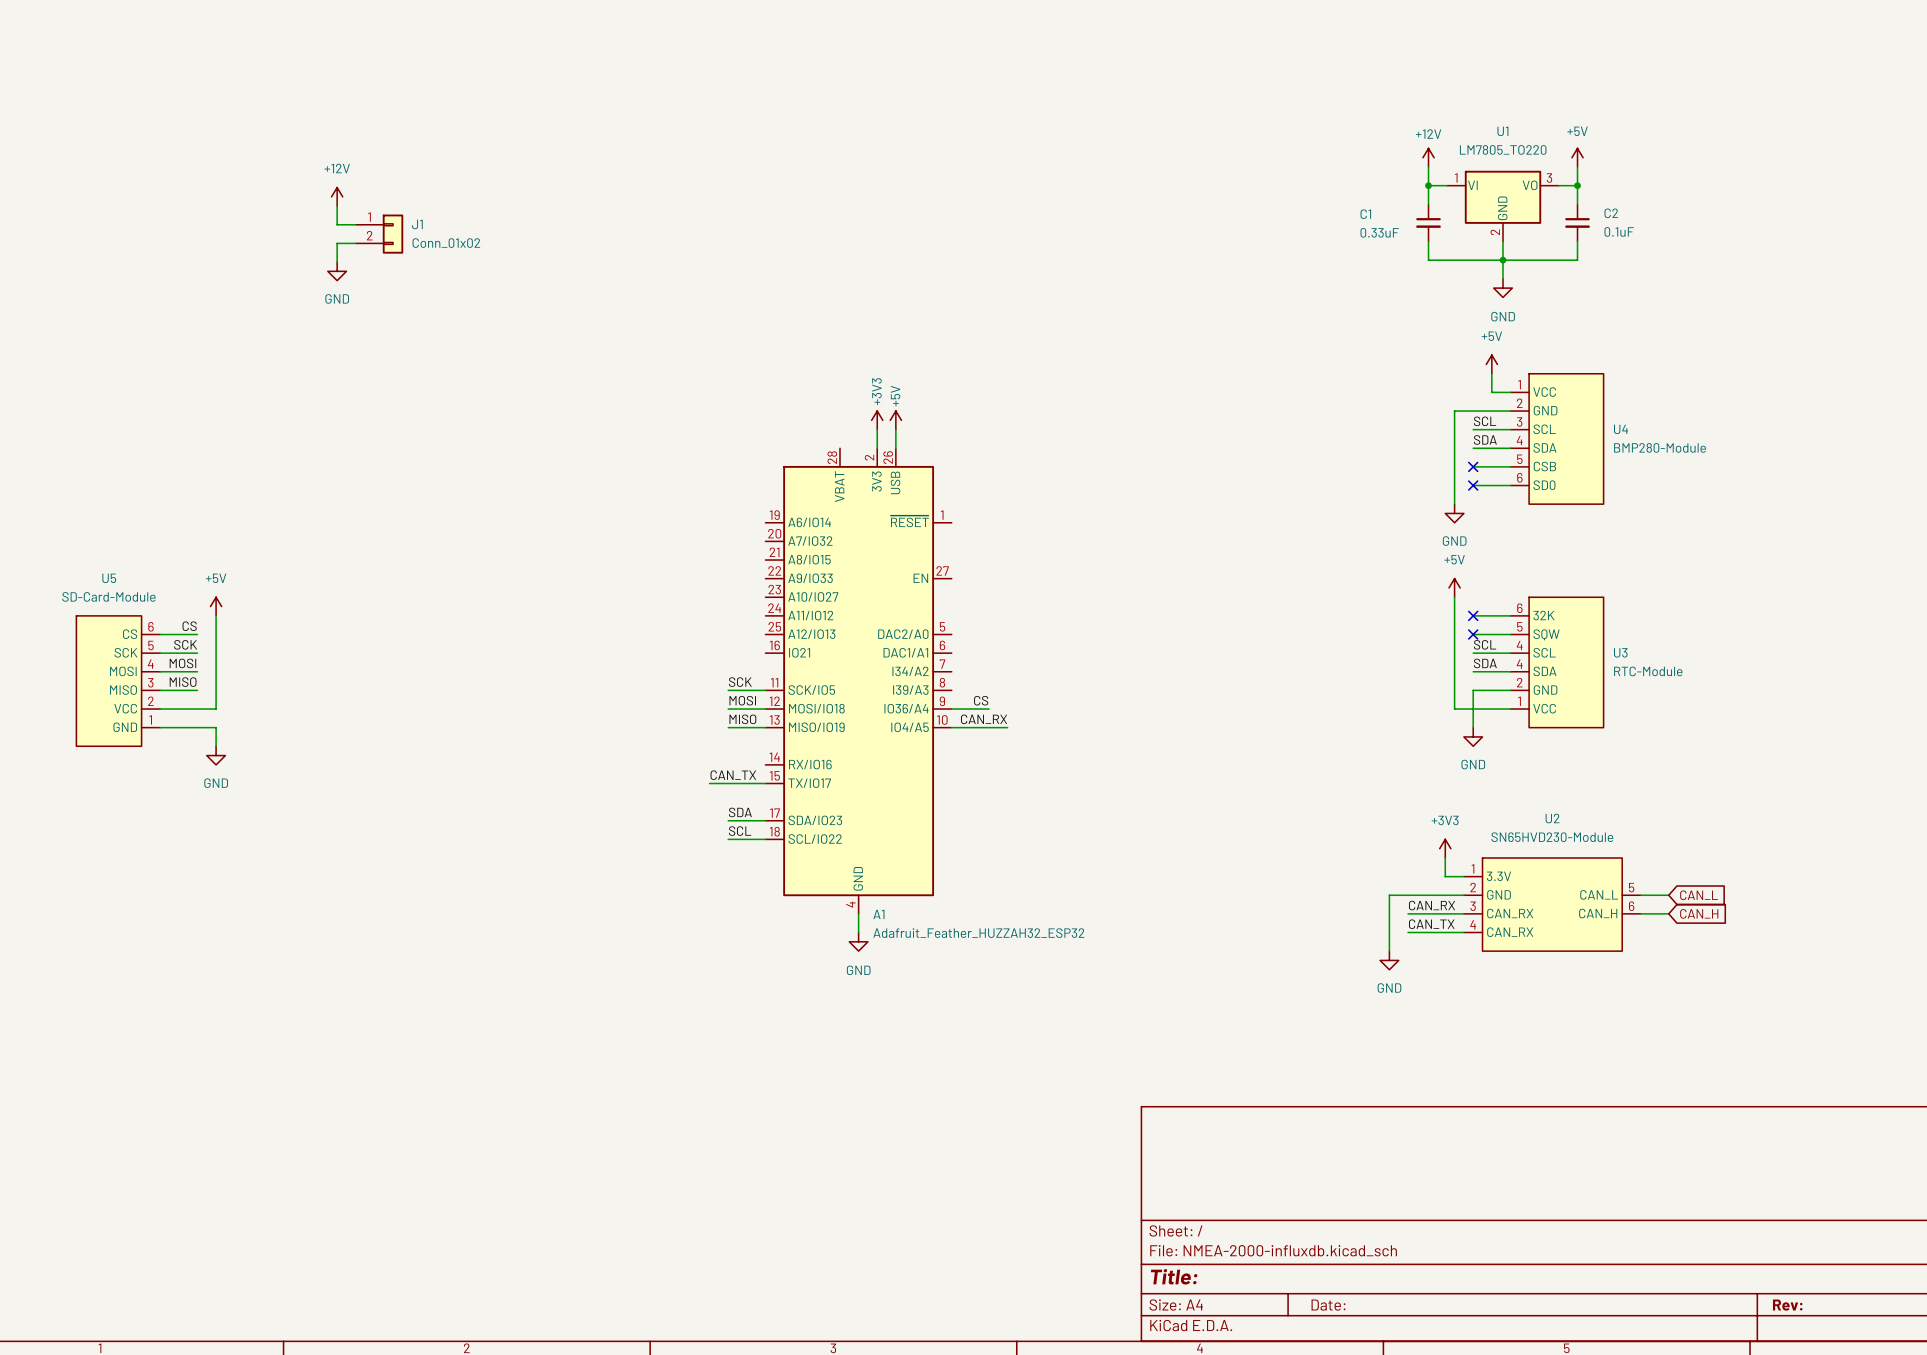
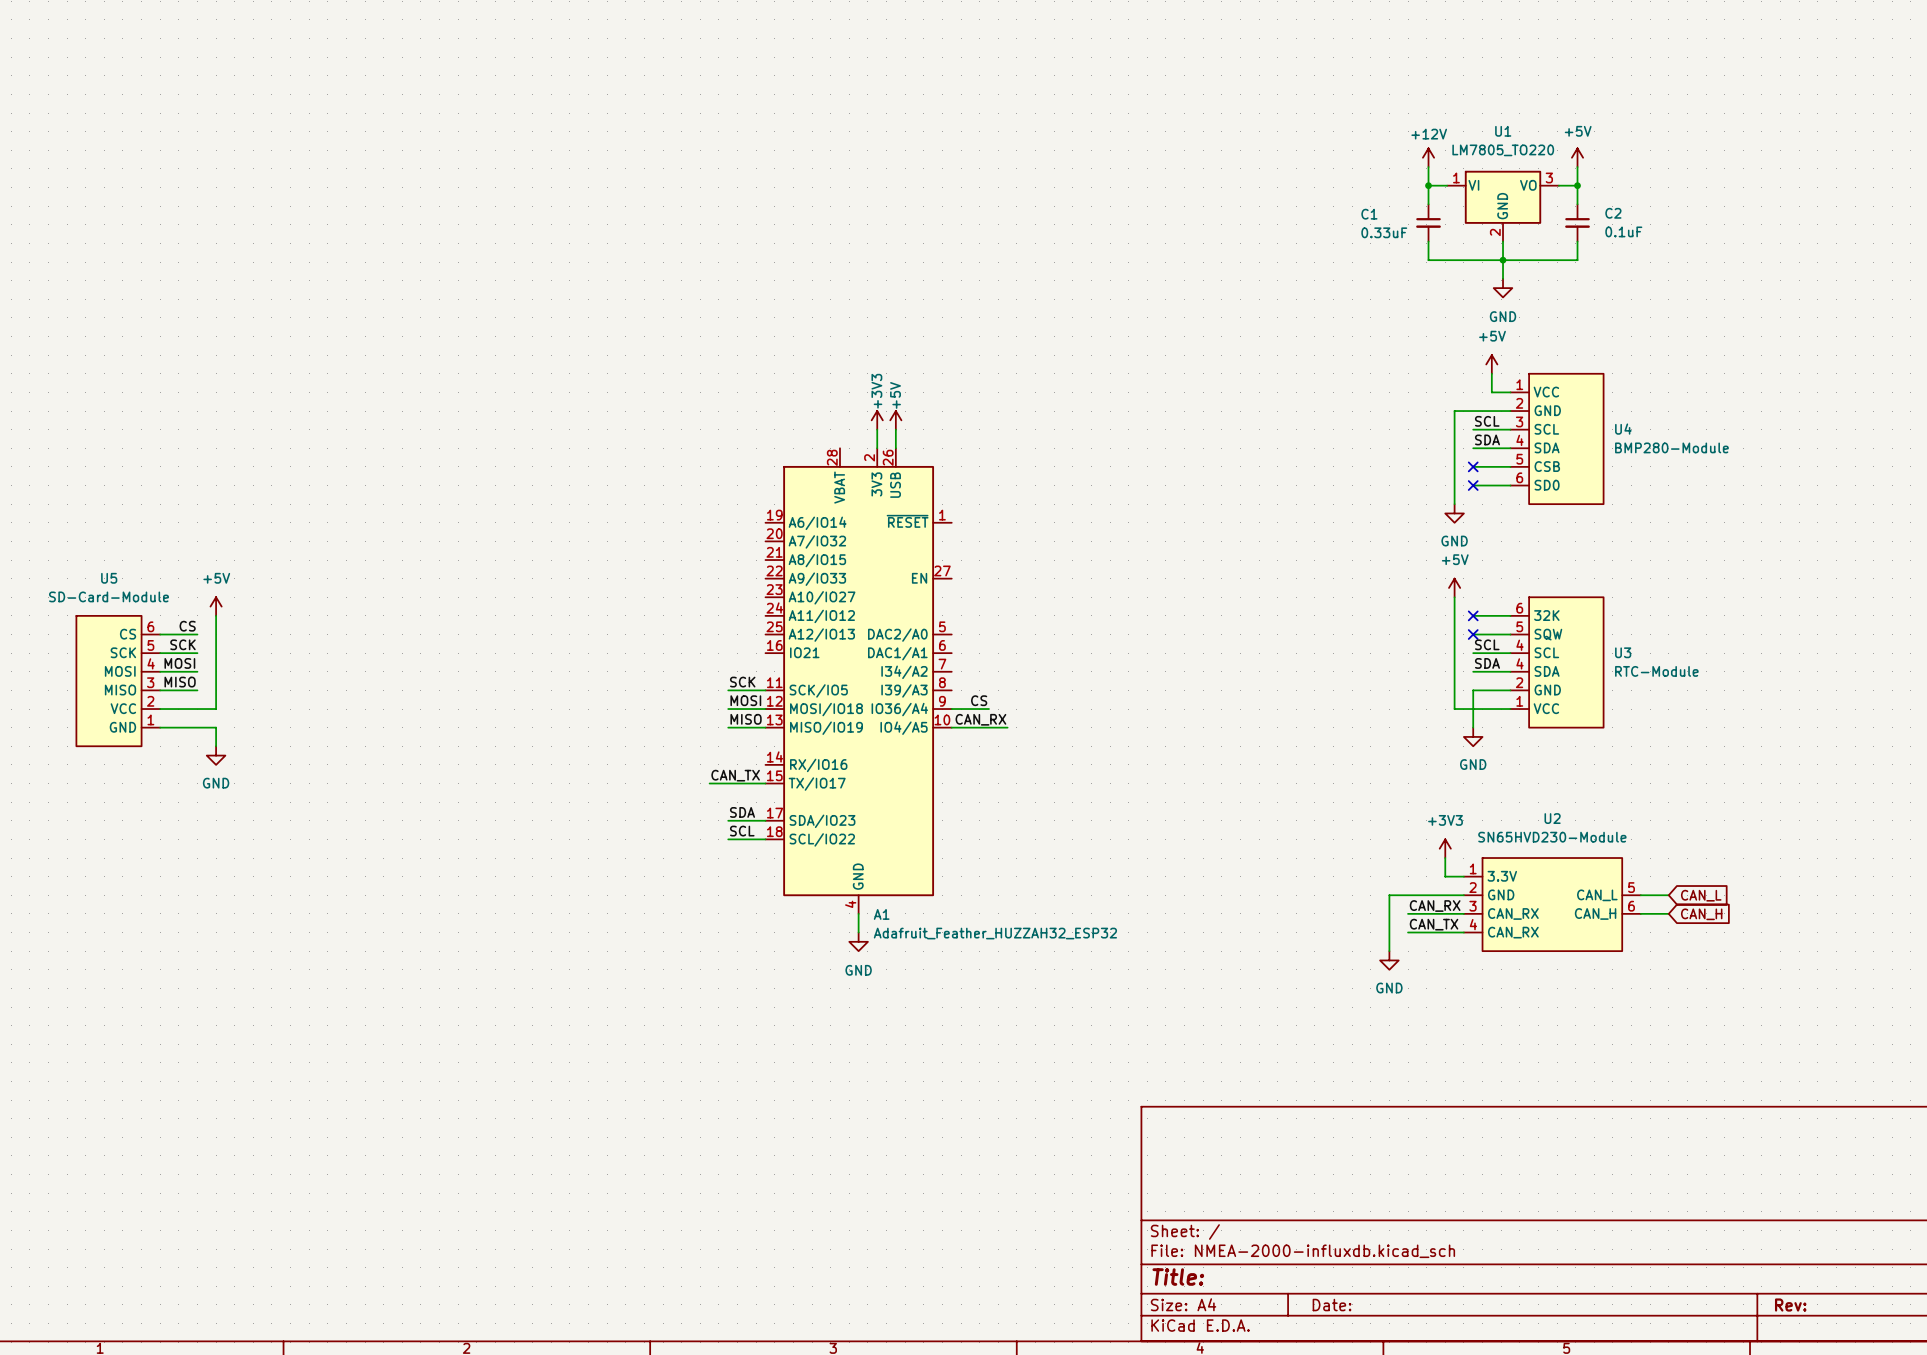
power symbol: +12V (337, 196) -> none
wire: (337, 206) (337, 224) (355, 224) -> none
J1: Conn_01x02 (379, 234) -> none
wire: (355, 243) (337, 243) (337, 262) -> none
power symbol: GND (337, 271) -> none

